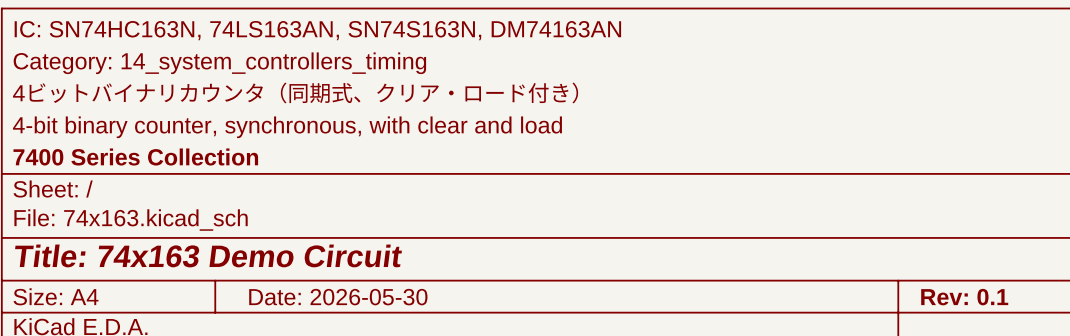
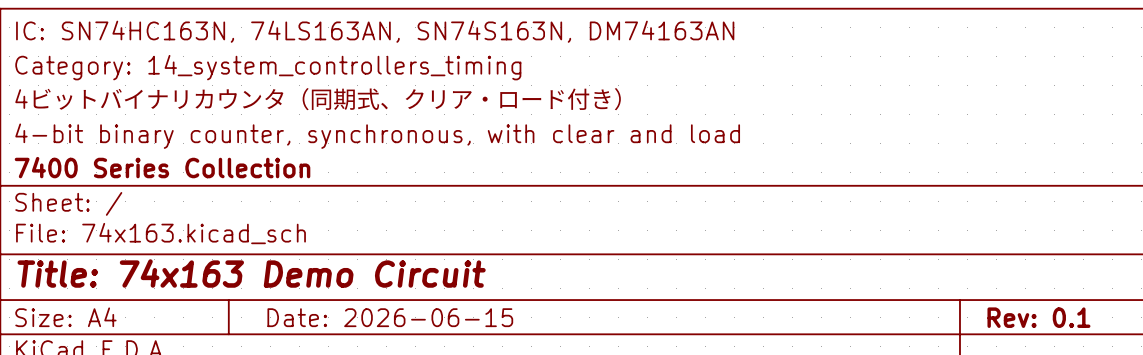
title block: Date: 2026-05-30 (338, 297) -> Date: 2026-06-15 (390, 317)

